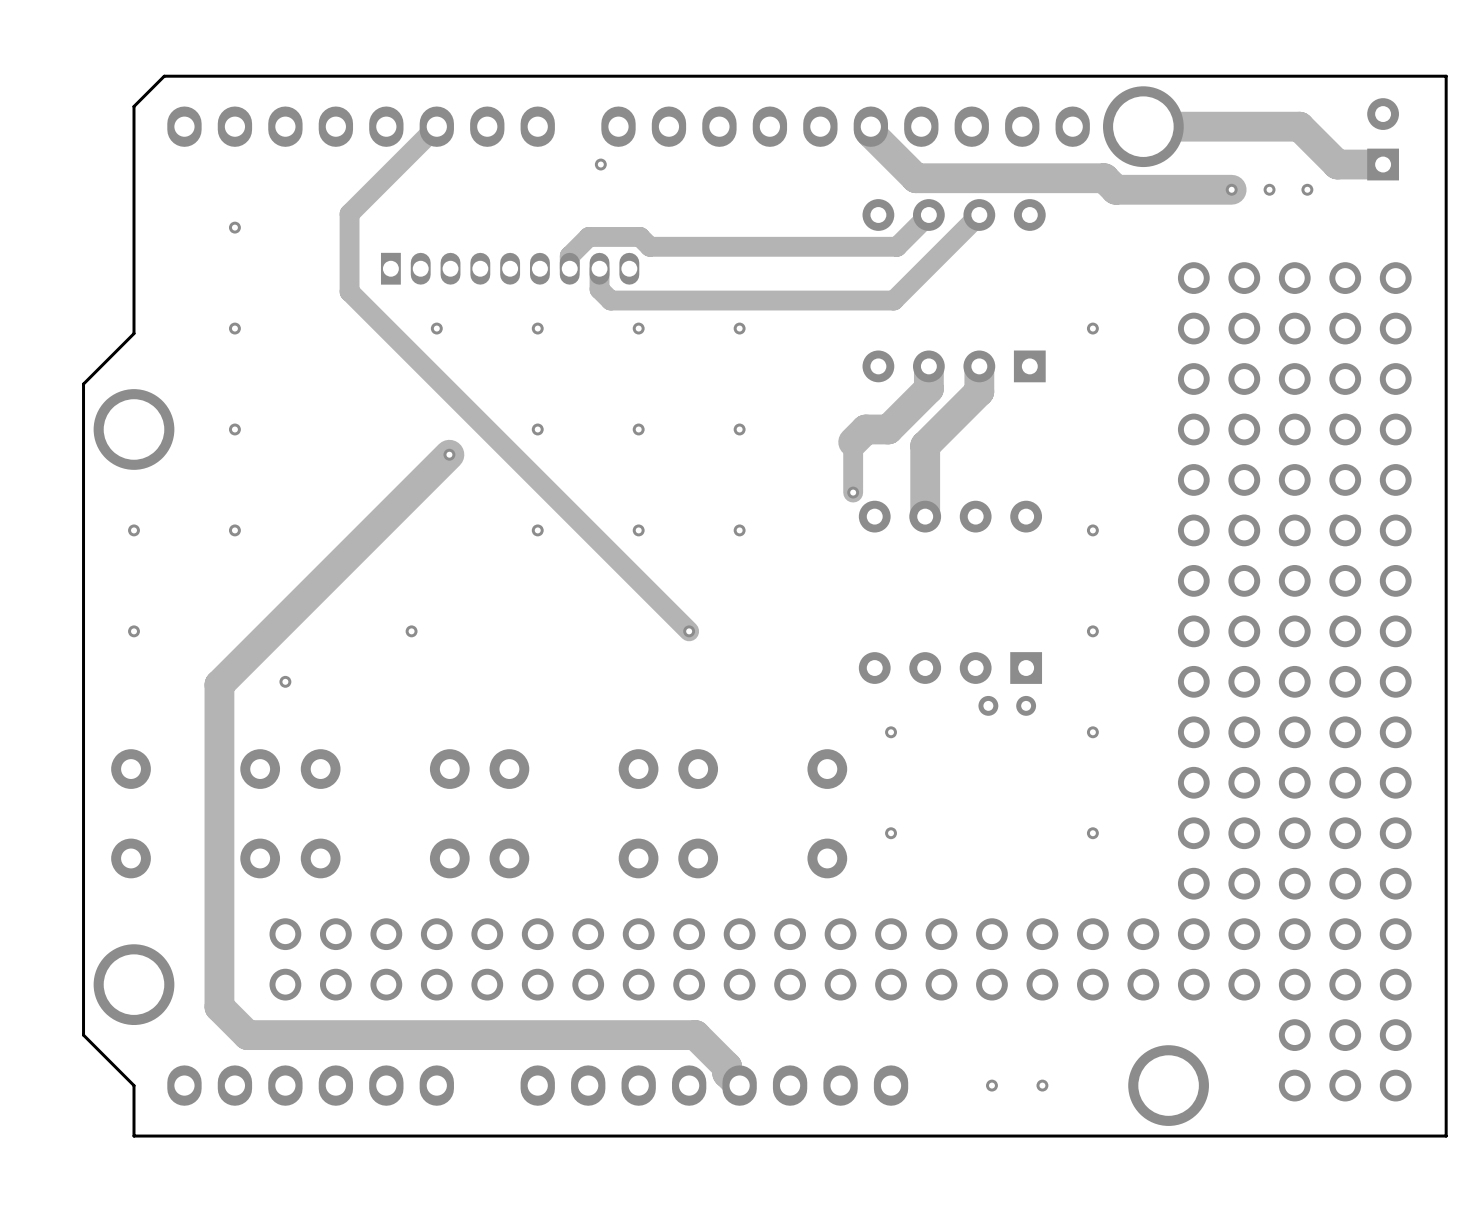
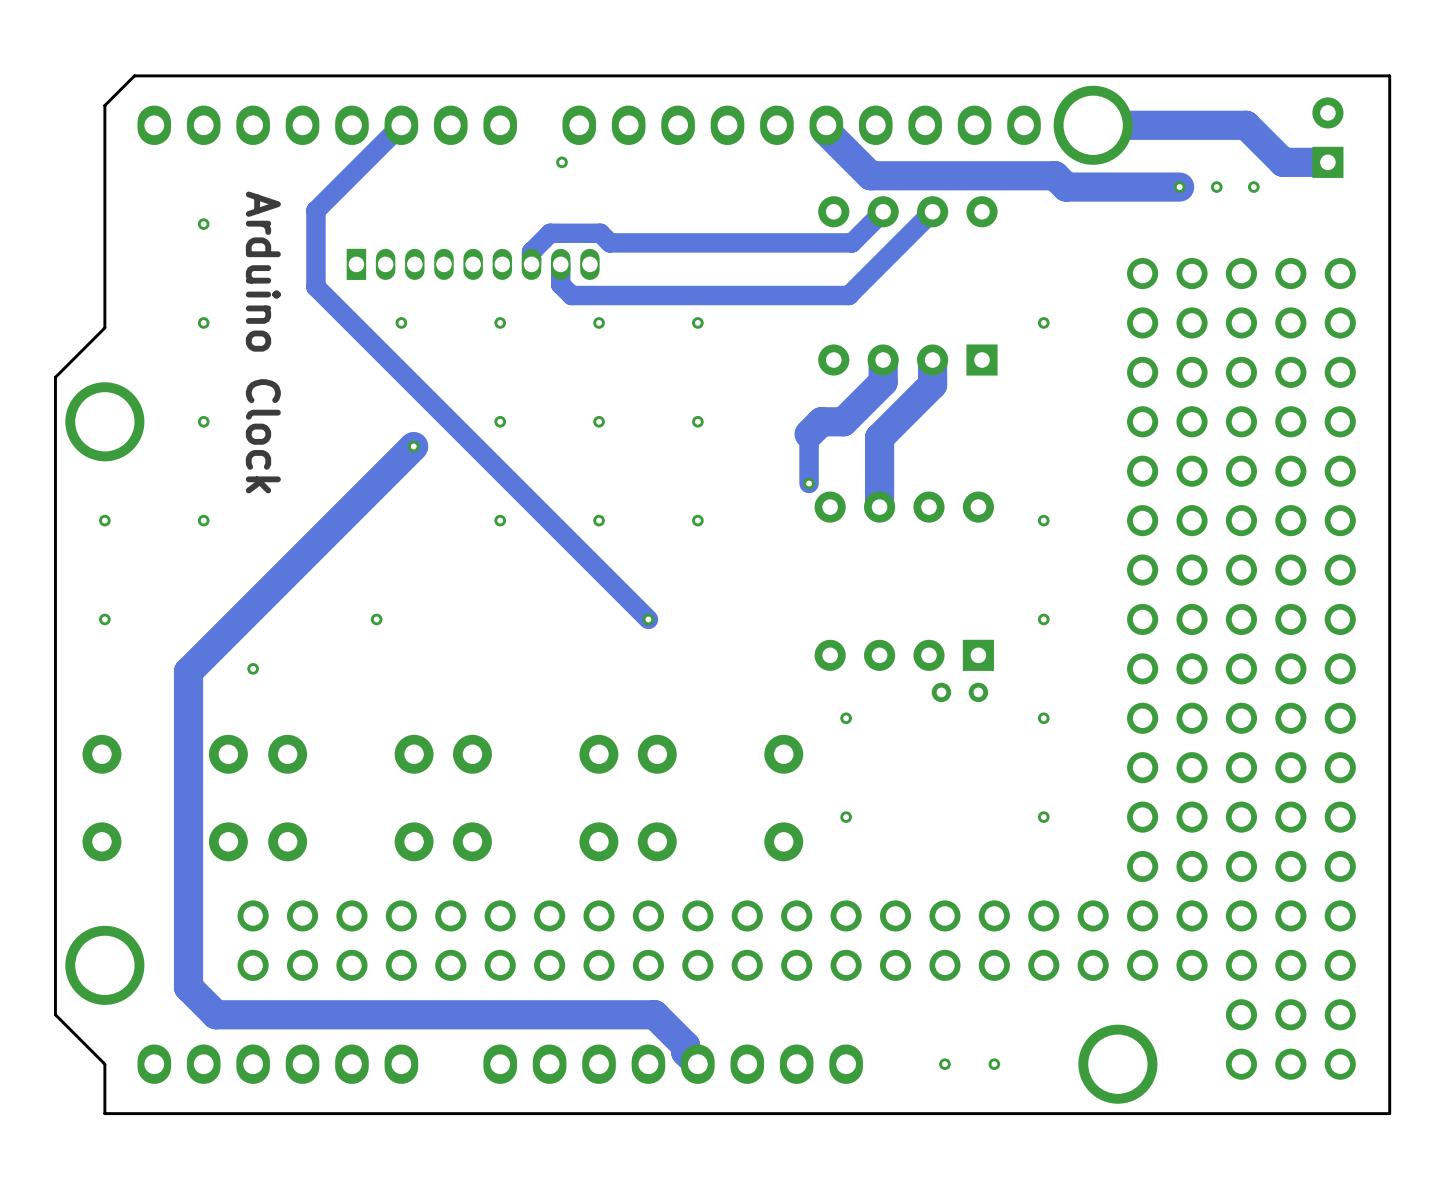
text: none -> Arduino Clock (263, 342)

